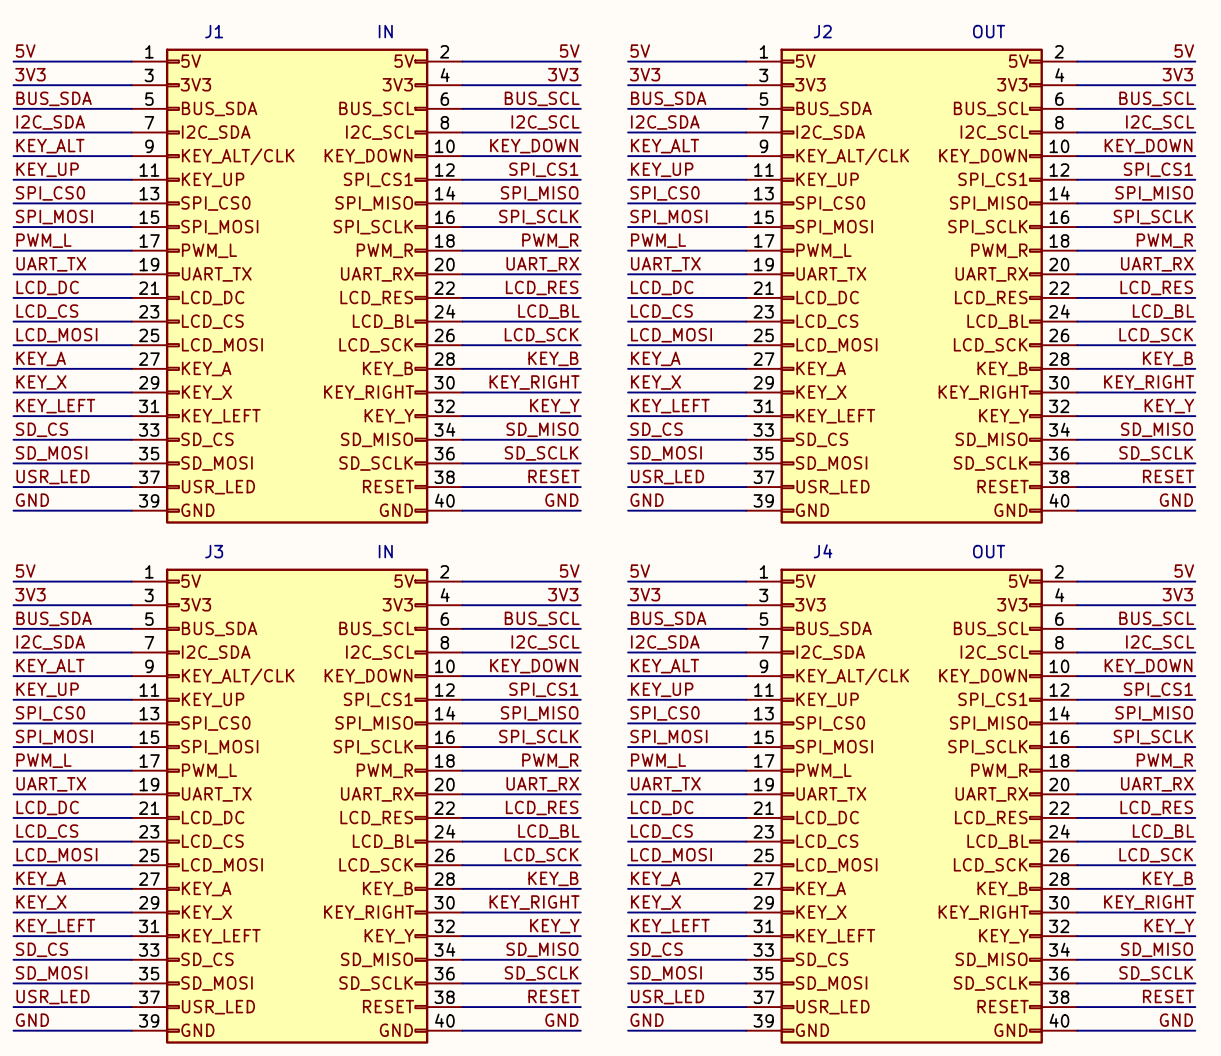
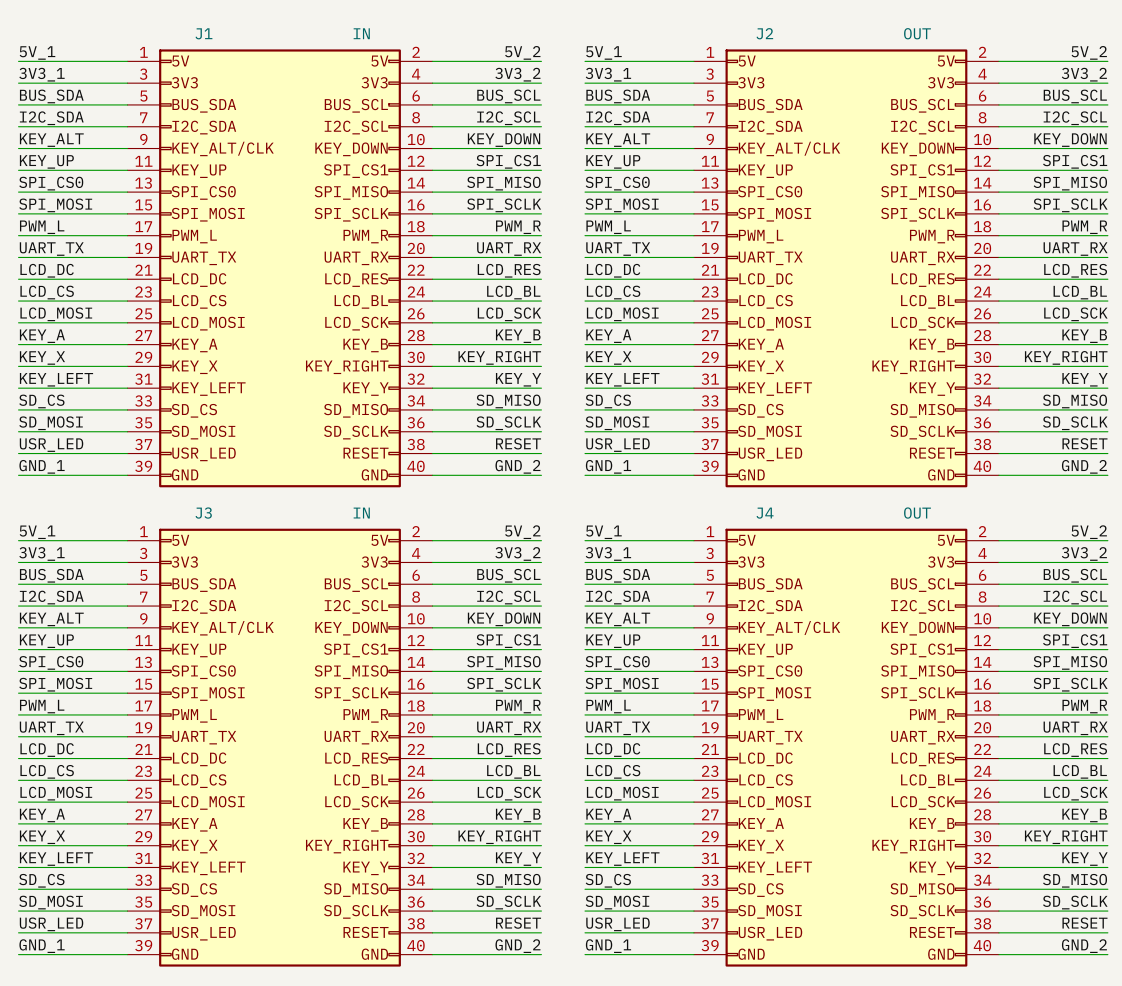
label: 5V (25, 51) -> 5V_1 (37, 52)
label: 5V (569, 51) -> 5V_2 (522, 52)
label: 5V (640, 51) -> 5V_1 (603, 52)
label: 5V (1184, 51) -> 5V_2 (1089, 52)
label: 3V3 (30, 74) -> 3V3_1 (41, 74)
label: 3V3 (563, 74) -> 3V3_2 (517, 74)
label: 3V3 (645, 74) -> 3V3_1 (608, 74)
label: 3V3 (1177, 74) -> 3V3_2 (1084, 74)
label: GND (32, 500) -> GND_1 (42, 466)
label: GND (561, 500) -> GND_2 (517, 466)
label: GND (647, 500) -> GND_1 (608, 466)
label: GND (1176, 500) -> GND_2 (1084, 466)
label: 5V (25, 571) -> 5V_1 (37, 532)
label: 5V (569, 571) -> 5V_2 (522, 532)
label: 5V (640, 571) -> 5V_1 (603, 532)
label: 5V (1184, 571) -> 5V_2 (1089, 532)
label: 3V3 (30, 594) -> 3V3_1 (41, 553)
label: 3V3 (563, 594) -> 3V3_2 (517, 553)
label: 3V3 (645, 594) -> 3V3_1 (608, 553)
label: 3V3 (1177, 594) -> 3V3_2 (1084, 553)
label: GND (32, 1020) -> GND_1 (42, 946)
label: GND (561, 1020) -> GND_2 (517, 946)
label: GND (647, 1020) -> GND_1 (608, 946)
label: GND (1176, 1020) -> GND_2 (1084, 946)

